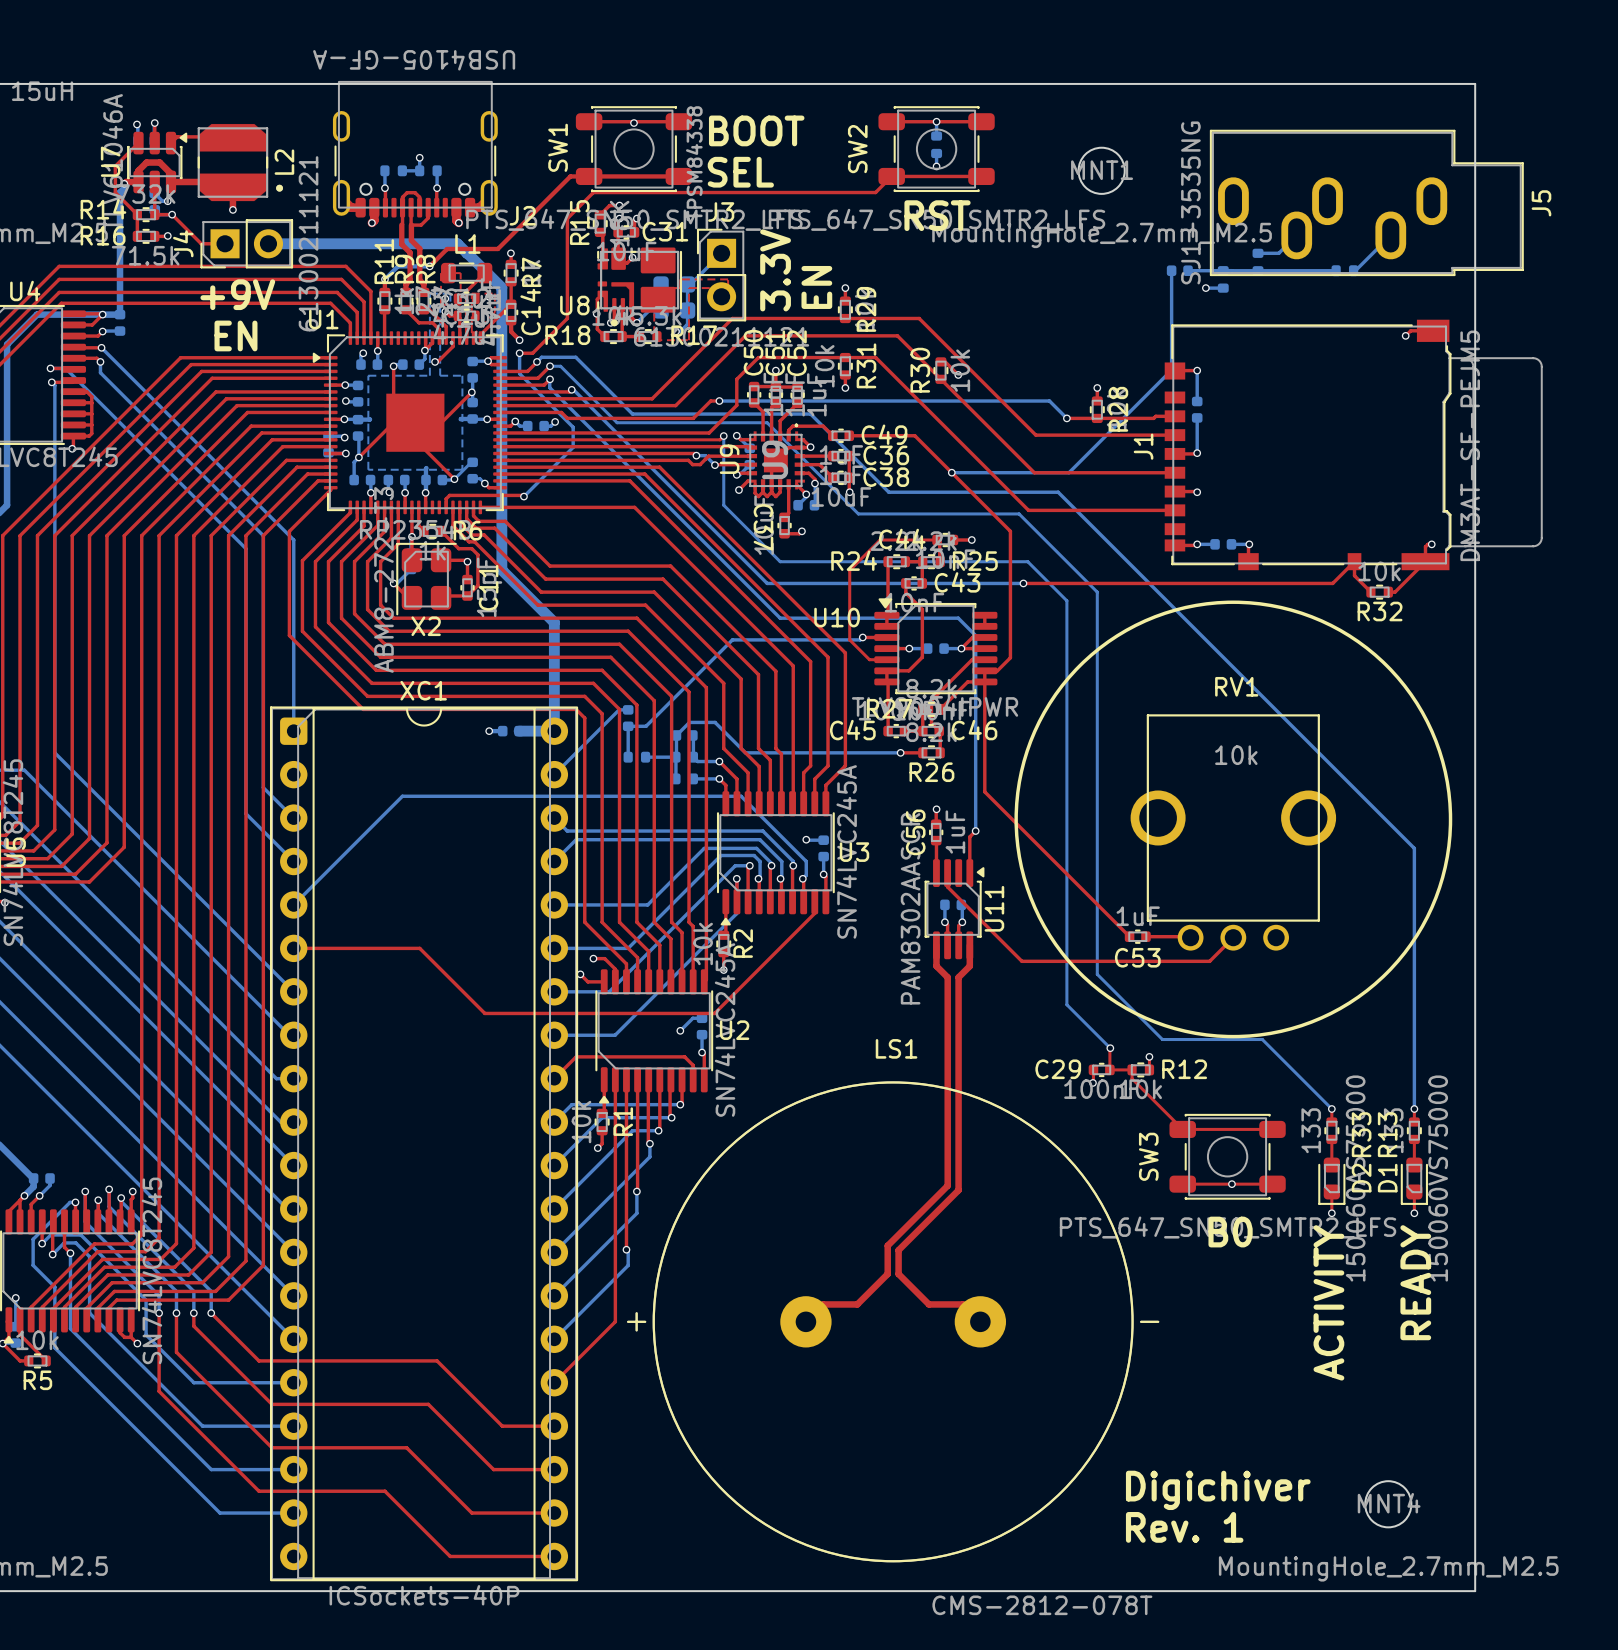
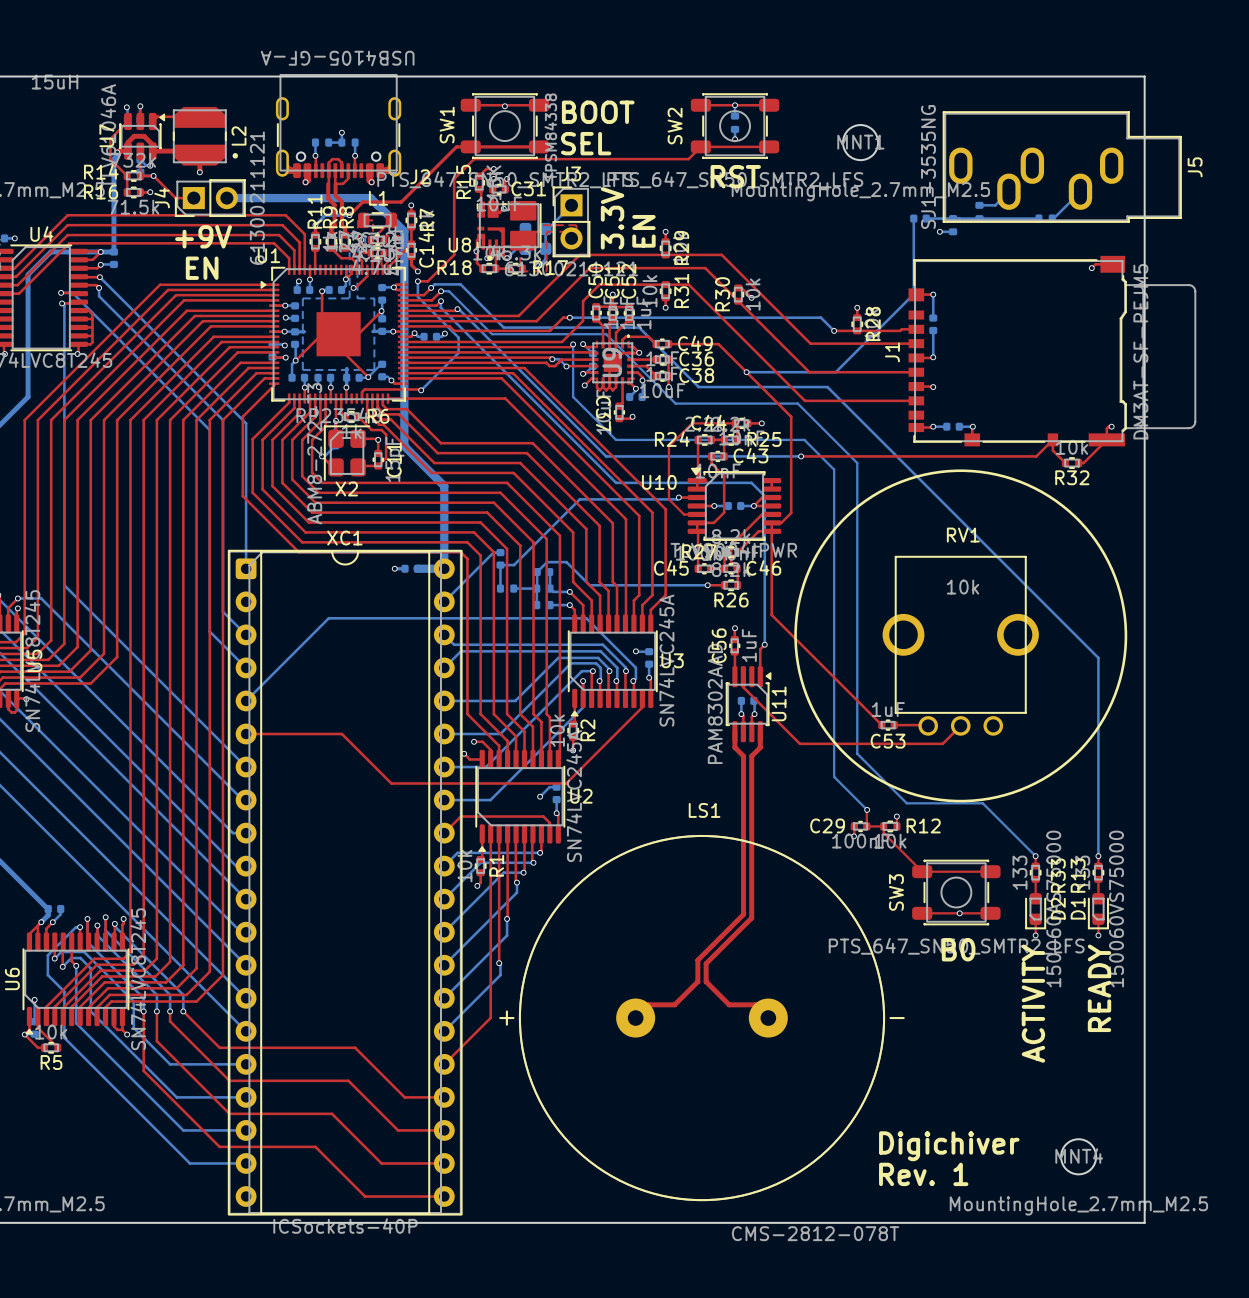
U9 text: U9 (729, 459) -> none
U11 value: PAM8302AASCR (910, 908) -> PAM8302AAD (715, 703)

